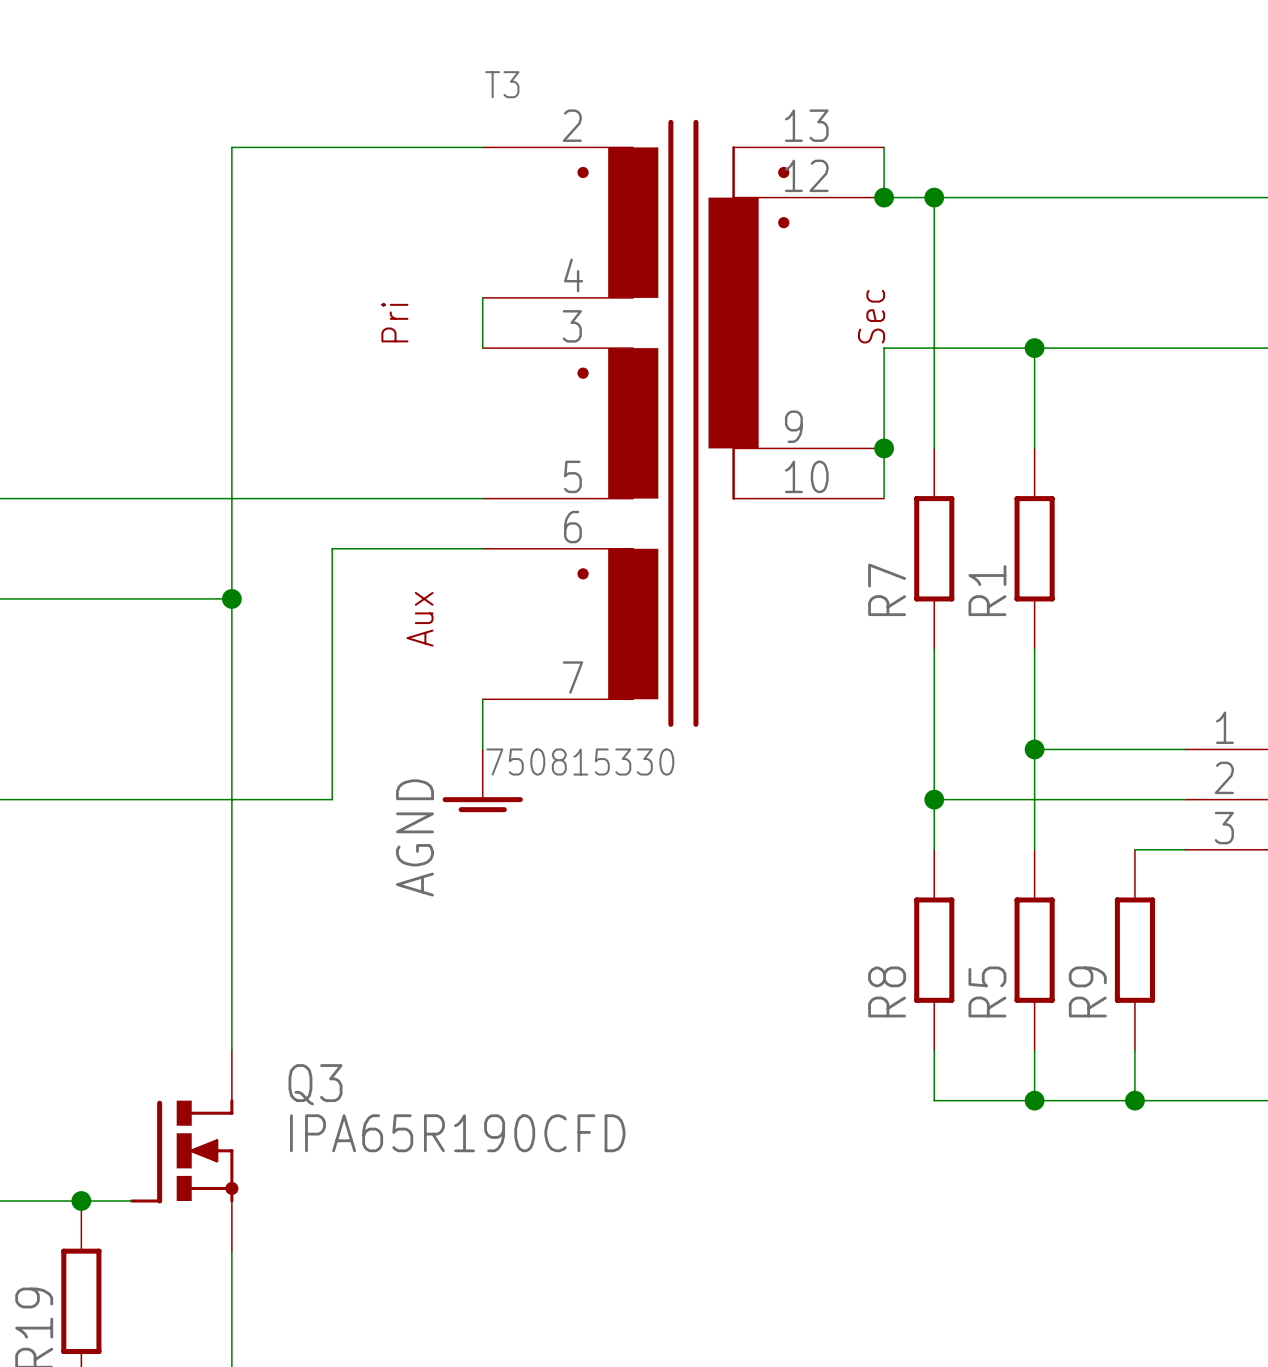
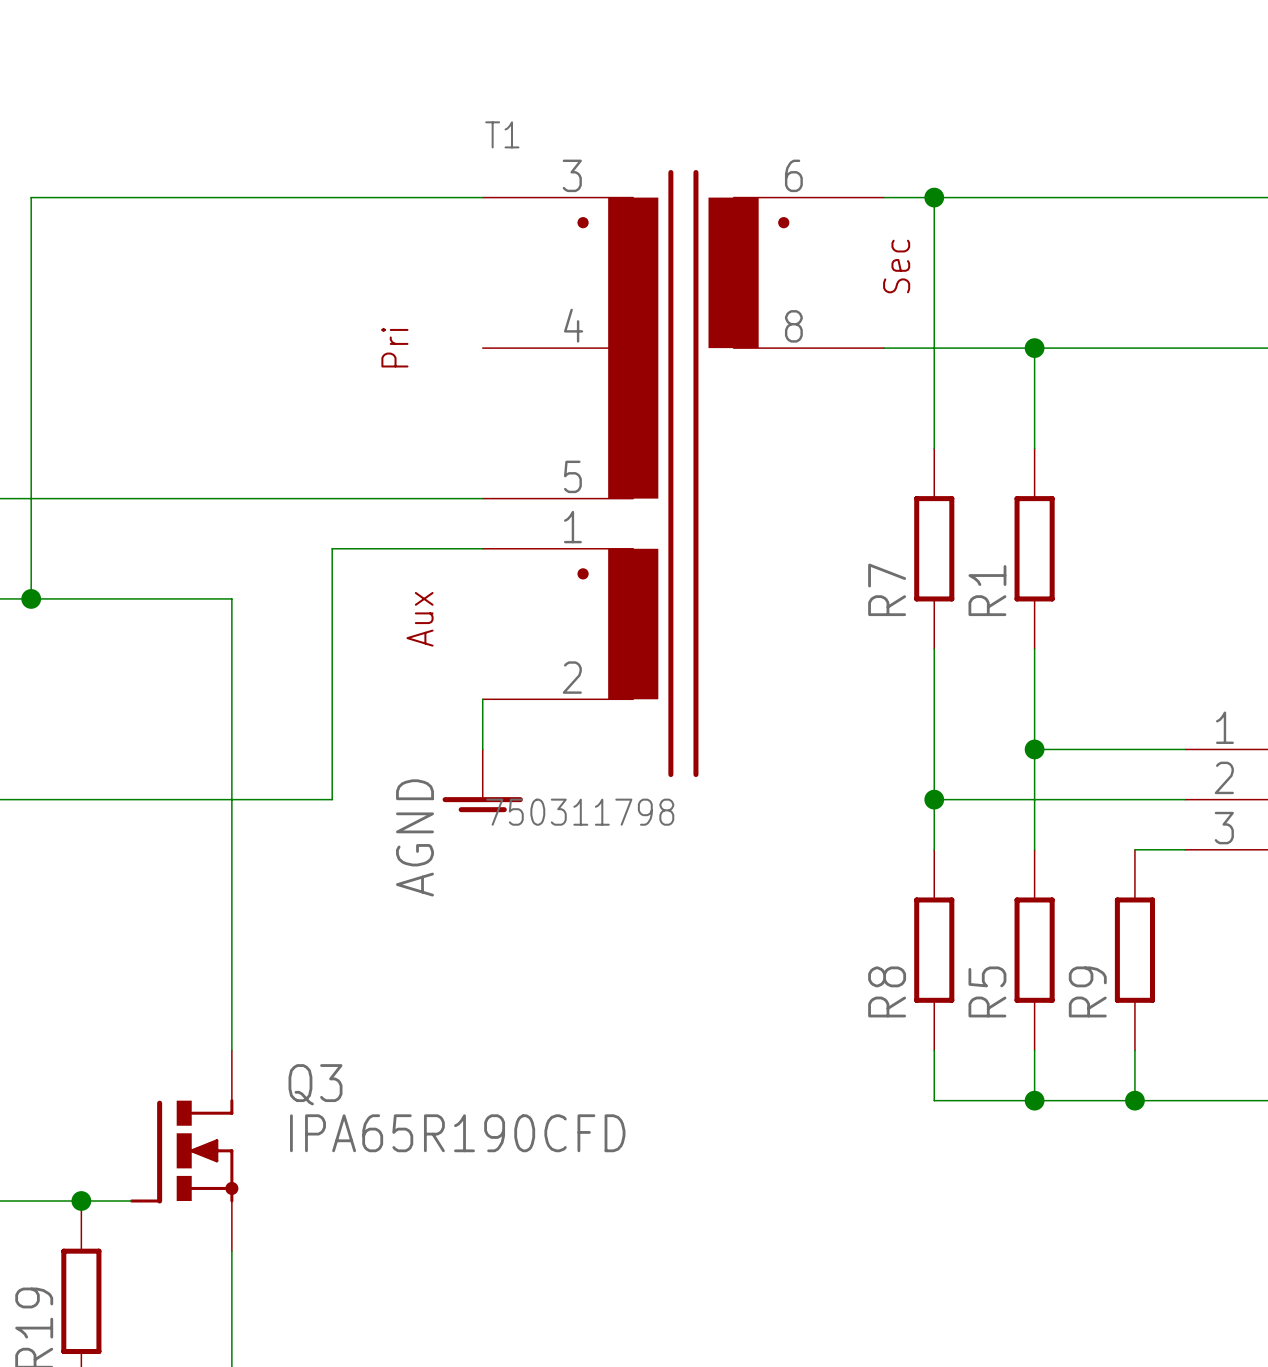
wire: (482, 147) (231, 147) (231, 598) -> none
wire: (884, 147) (884, 197) -> none
wire: none -> (482, 197) (31, 197) (31, 598)
junction: (884, 197) -> none
wire: (482, 297) (482, 348) -> none
wire: (884, 348) (884, 498) -> none
T3: 750815330 (683, 423) -> none
junction: (884, 448) -> none
T1: none -> 750311798 (683, 473)
junction: none -> (31, 598)
junction: (231, 598) -> none

